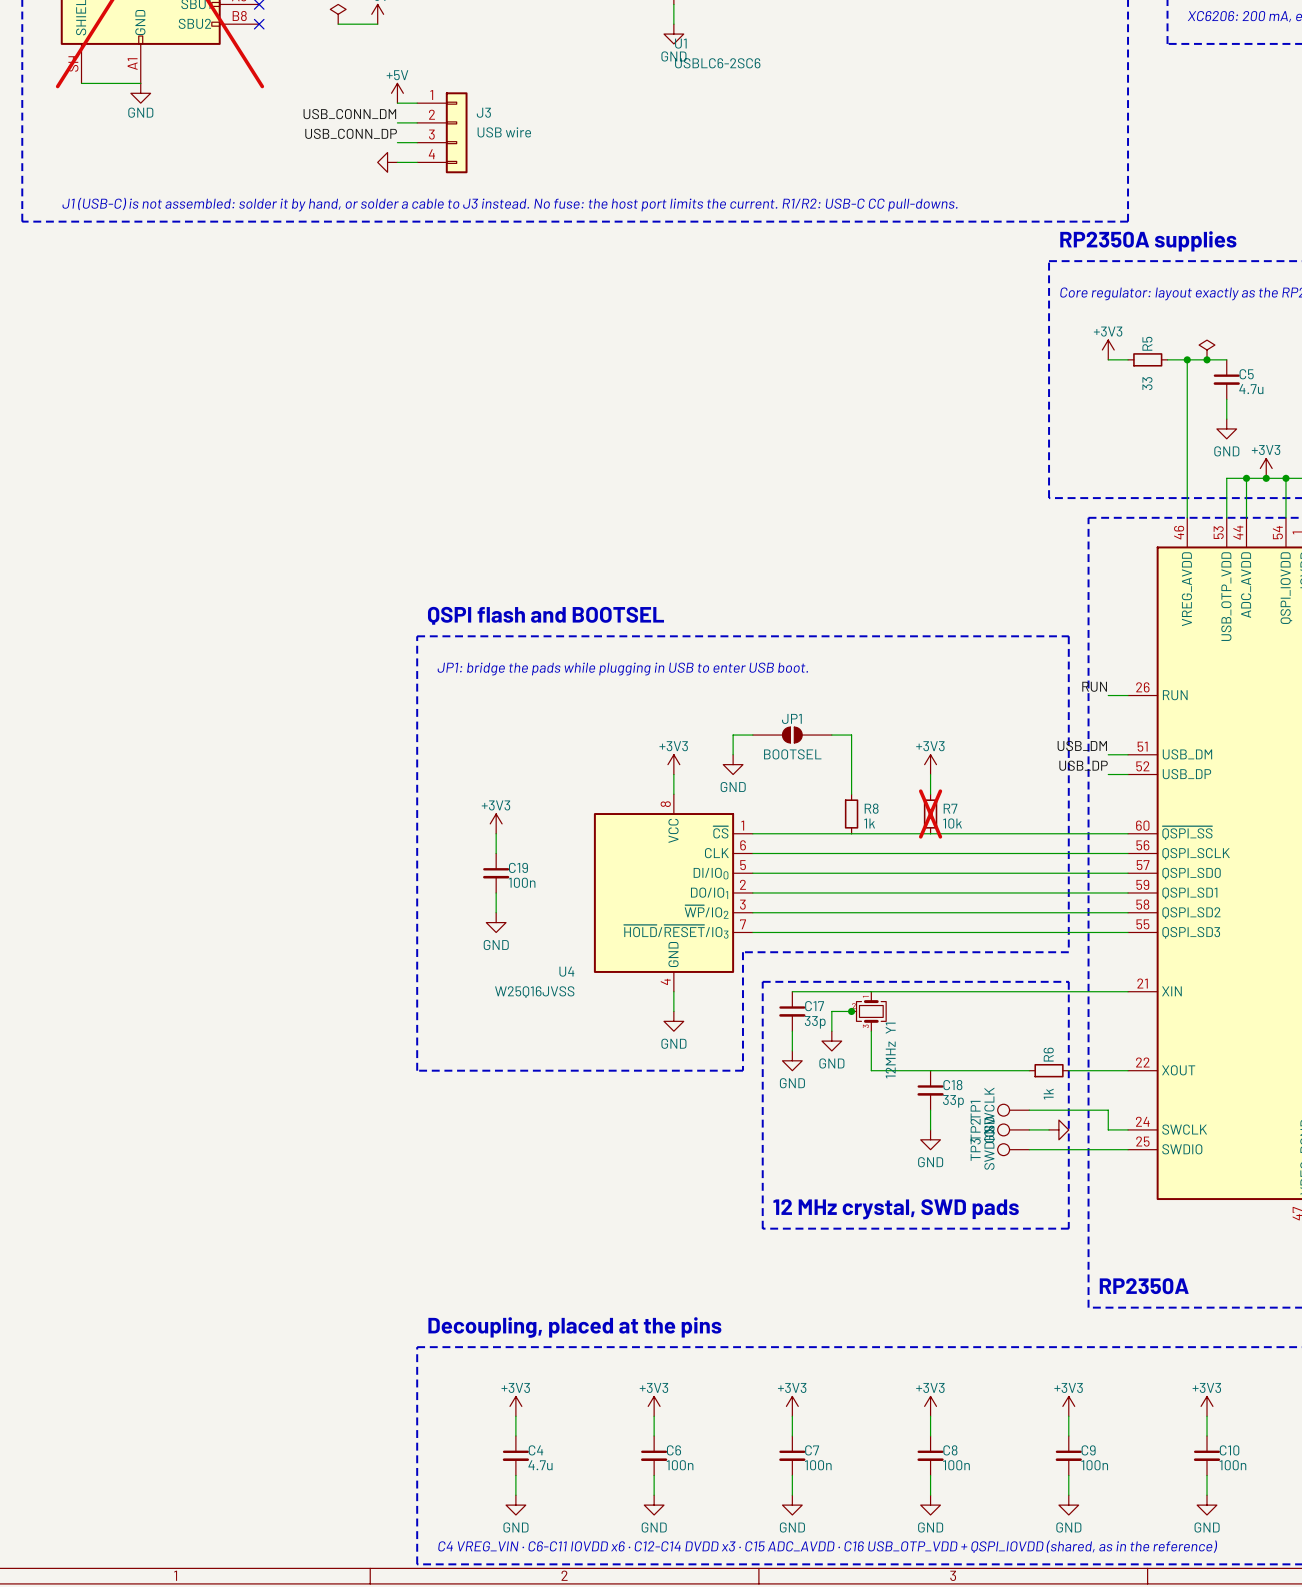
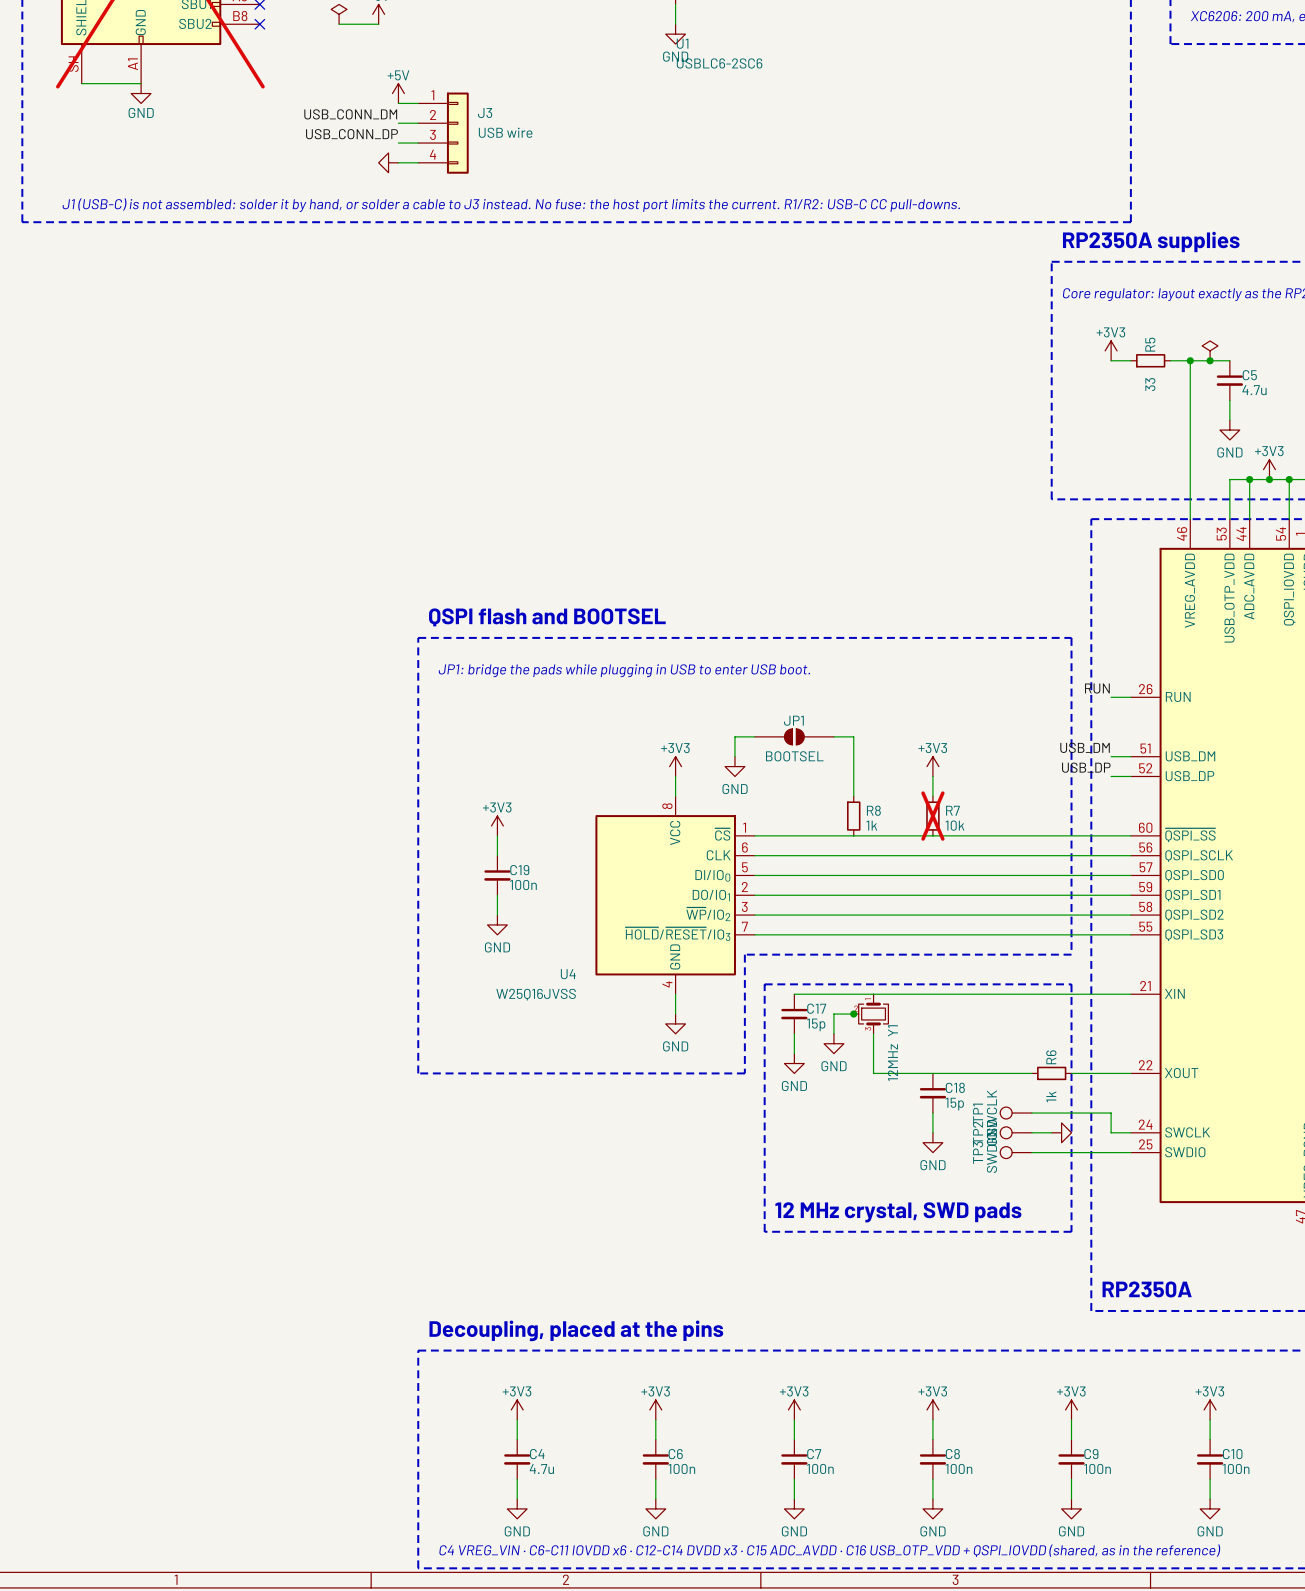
C17 value: 33p (815, 1022) -> 15p (816, 1024)
C18 value: 33p (953, 1101) -> 15p (954, 1104)

